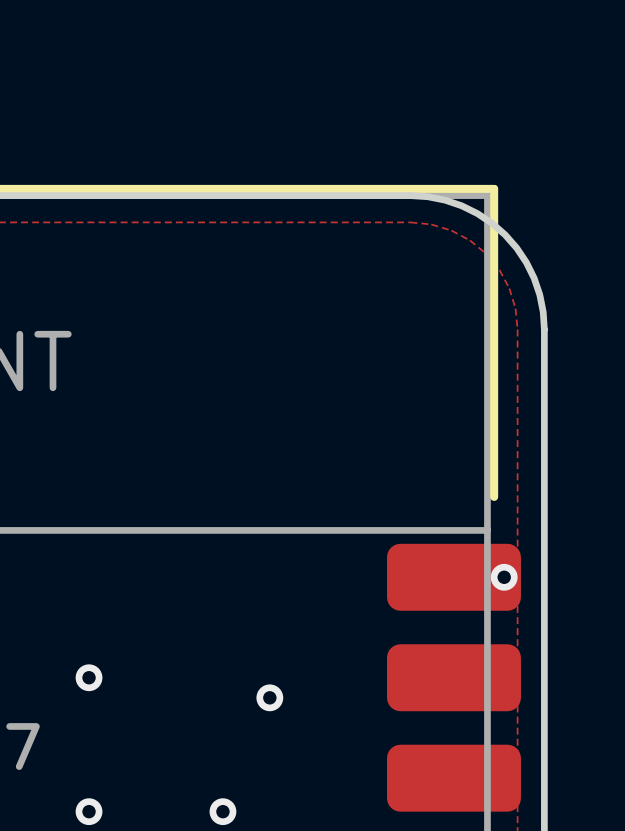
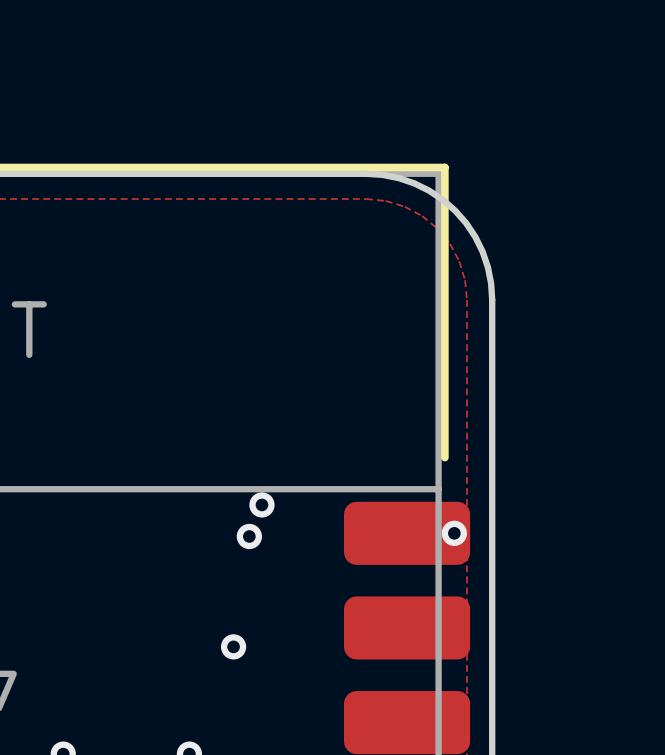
via: none -> (261, 504)
via: none -> (249, 536)
via: (89, 677) -> none

